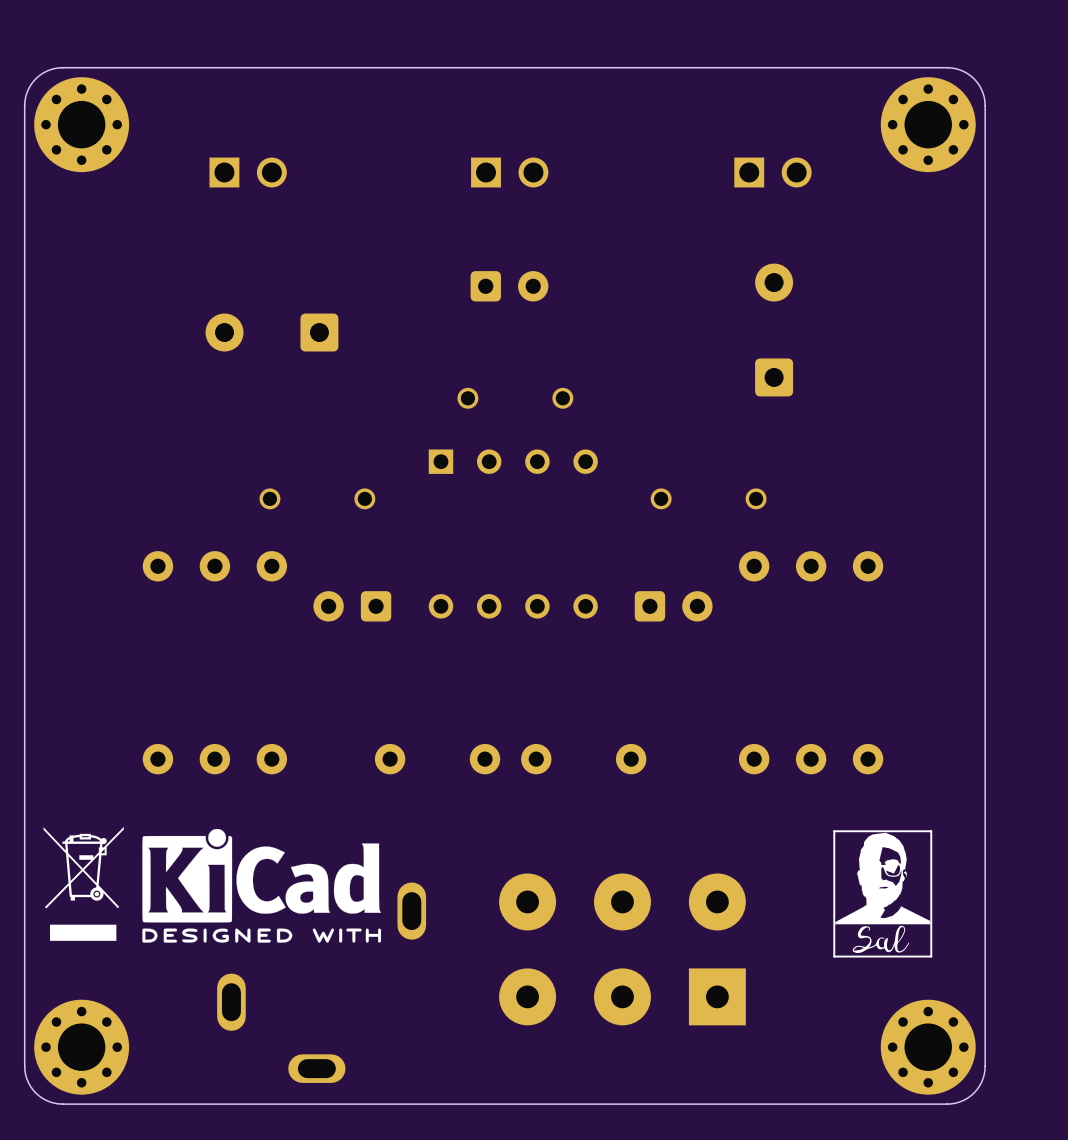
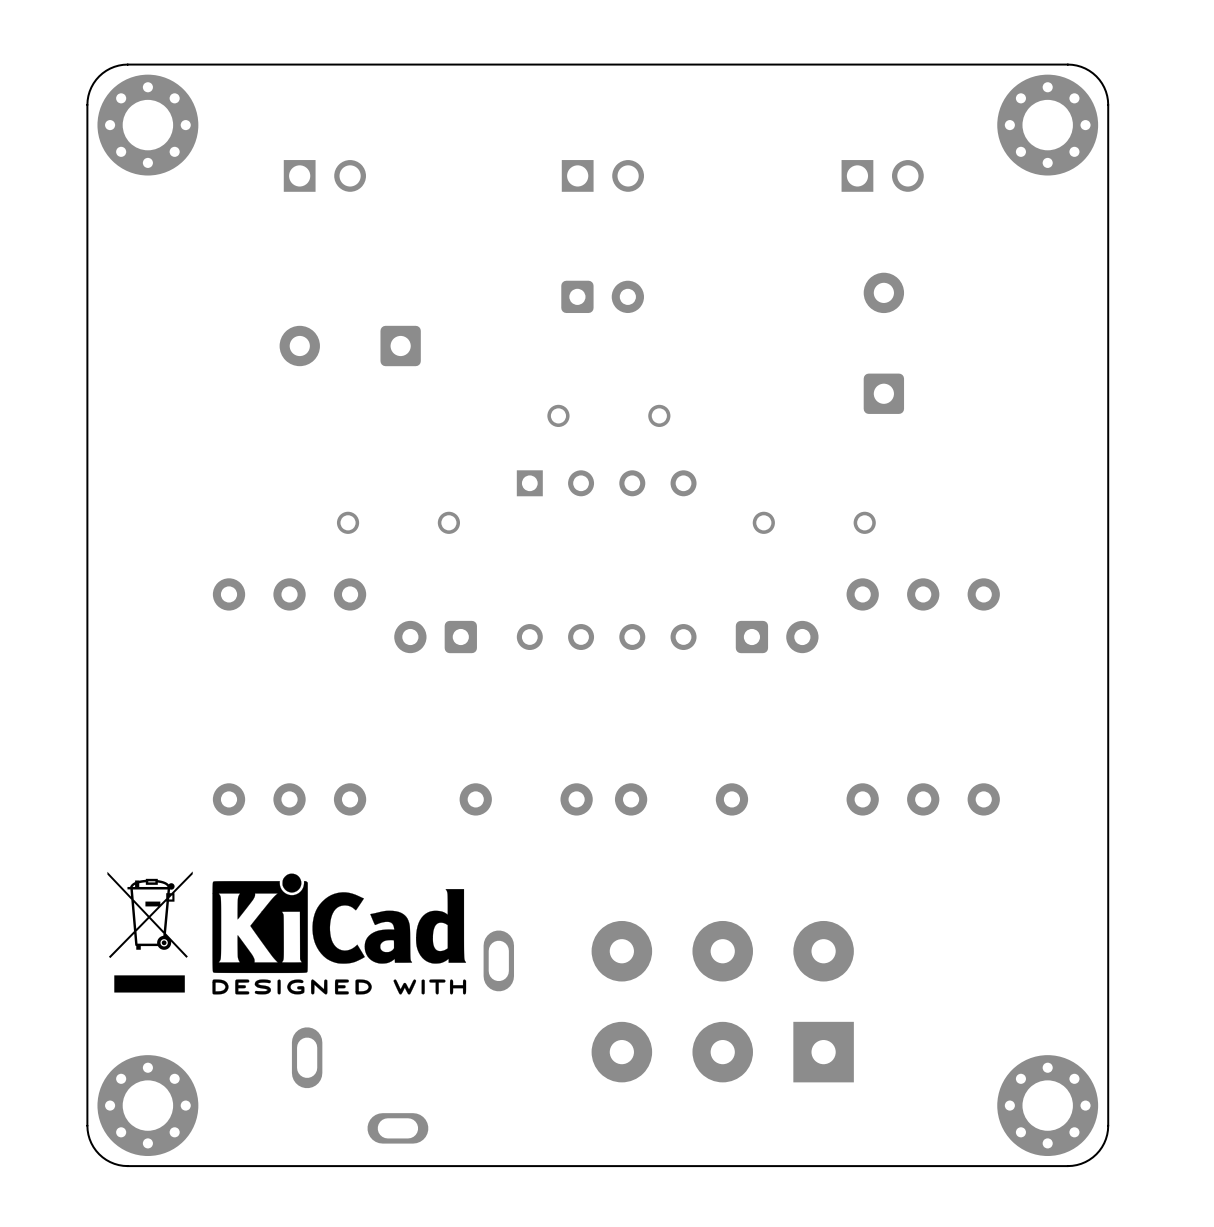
line: (931, 831) (931, 956) (834, 956) (834, 831) (931, 831) -> none
drawing: [835, 832, 931, 954] -> none

